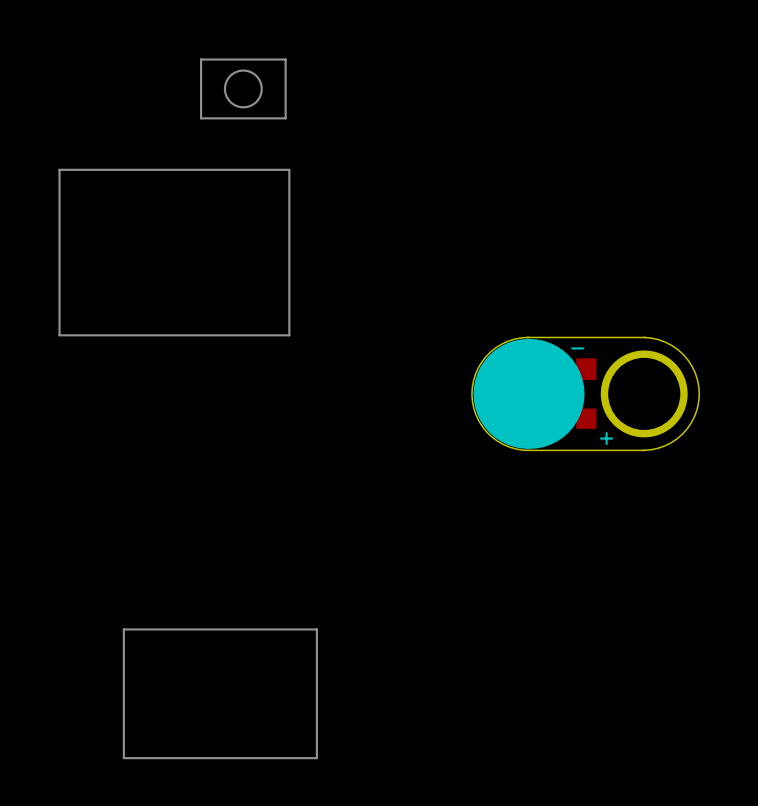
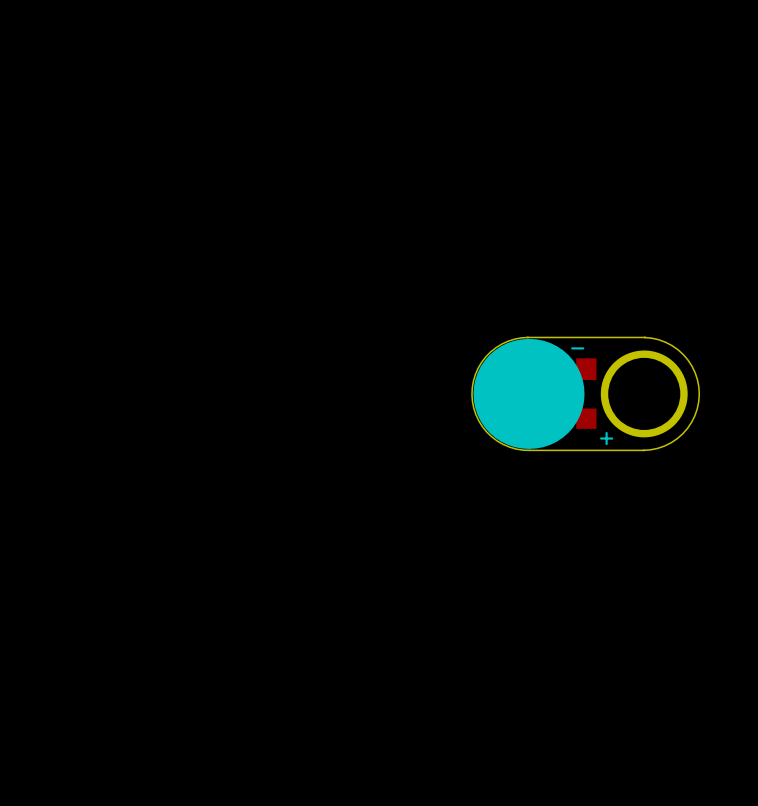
line: (201, 59) (201, 118) (285, 118) (285, 59) (201, 59) -> none
drawing: [223, 69, 263, 109] -> none
line: (59, 169) (59, 335) (289, 335) (289, 169) (59, 169) -> none
line: (123, 629) (123, 758) (316, 758) (316, 629) (123, 629) -> none

